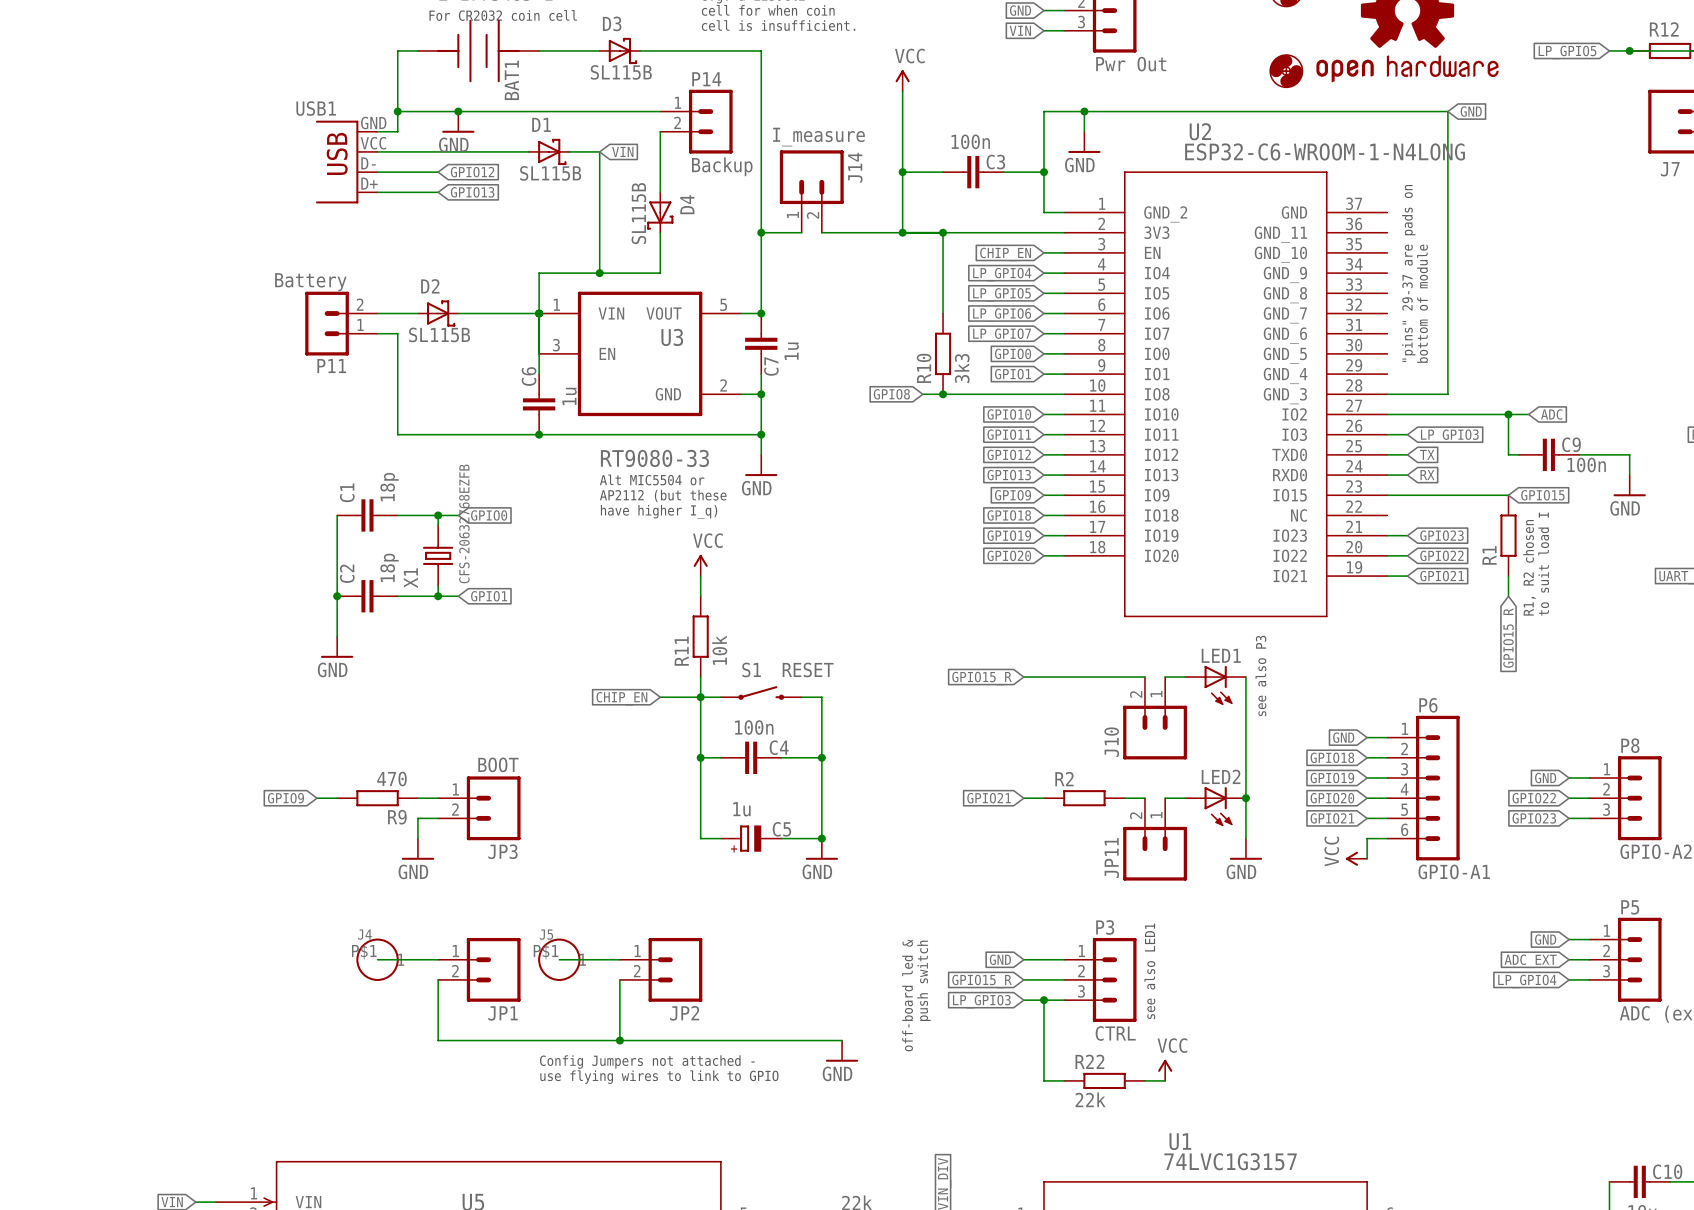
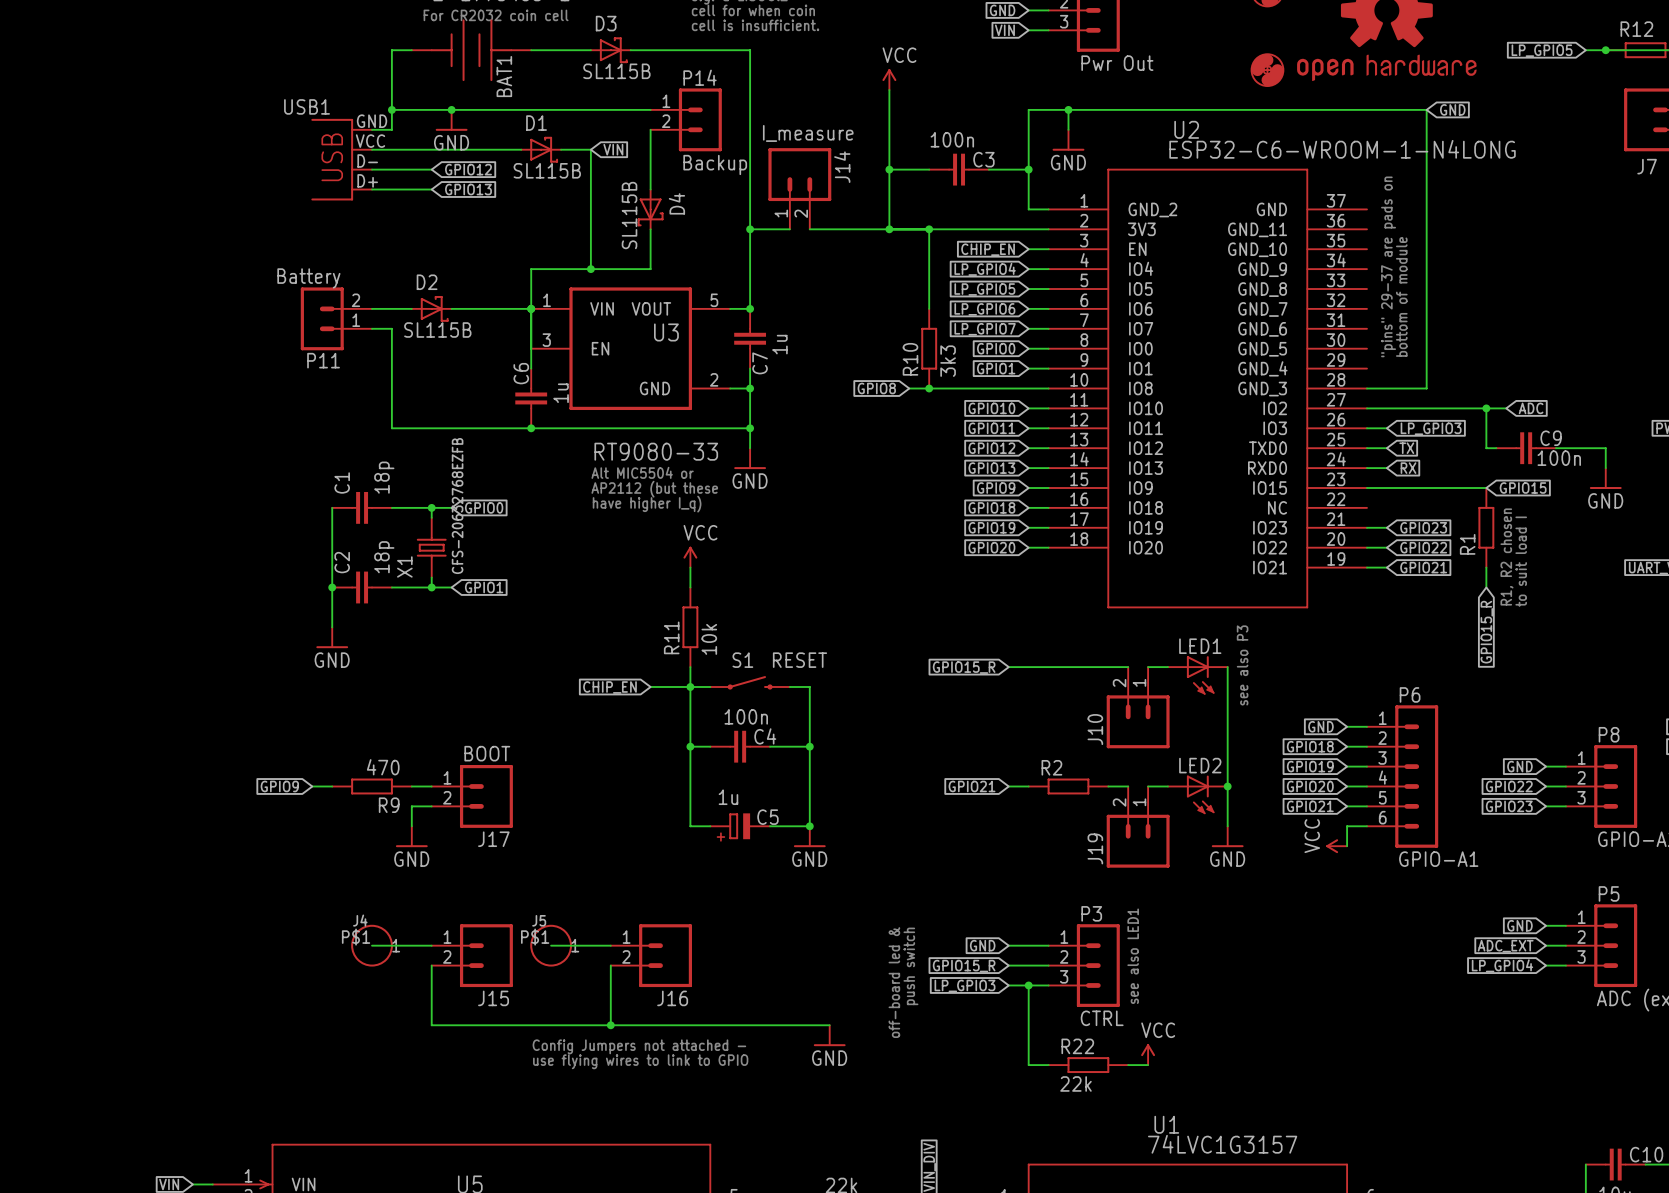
JP3 name: JP3 (502, 851) -> J17 (493, 839)
JP11 name: JP11 (1111, 858) -> J19 (1095, 848)
JP1 name: JP1 (503, 1013) -> J15 (493, 998)
JP2 name: JP2 (684, 1013) -> J16 (672, 998)

